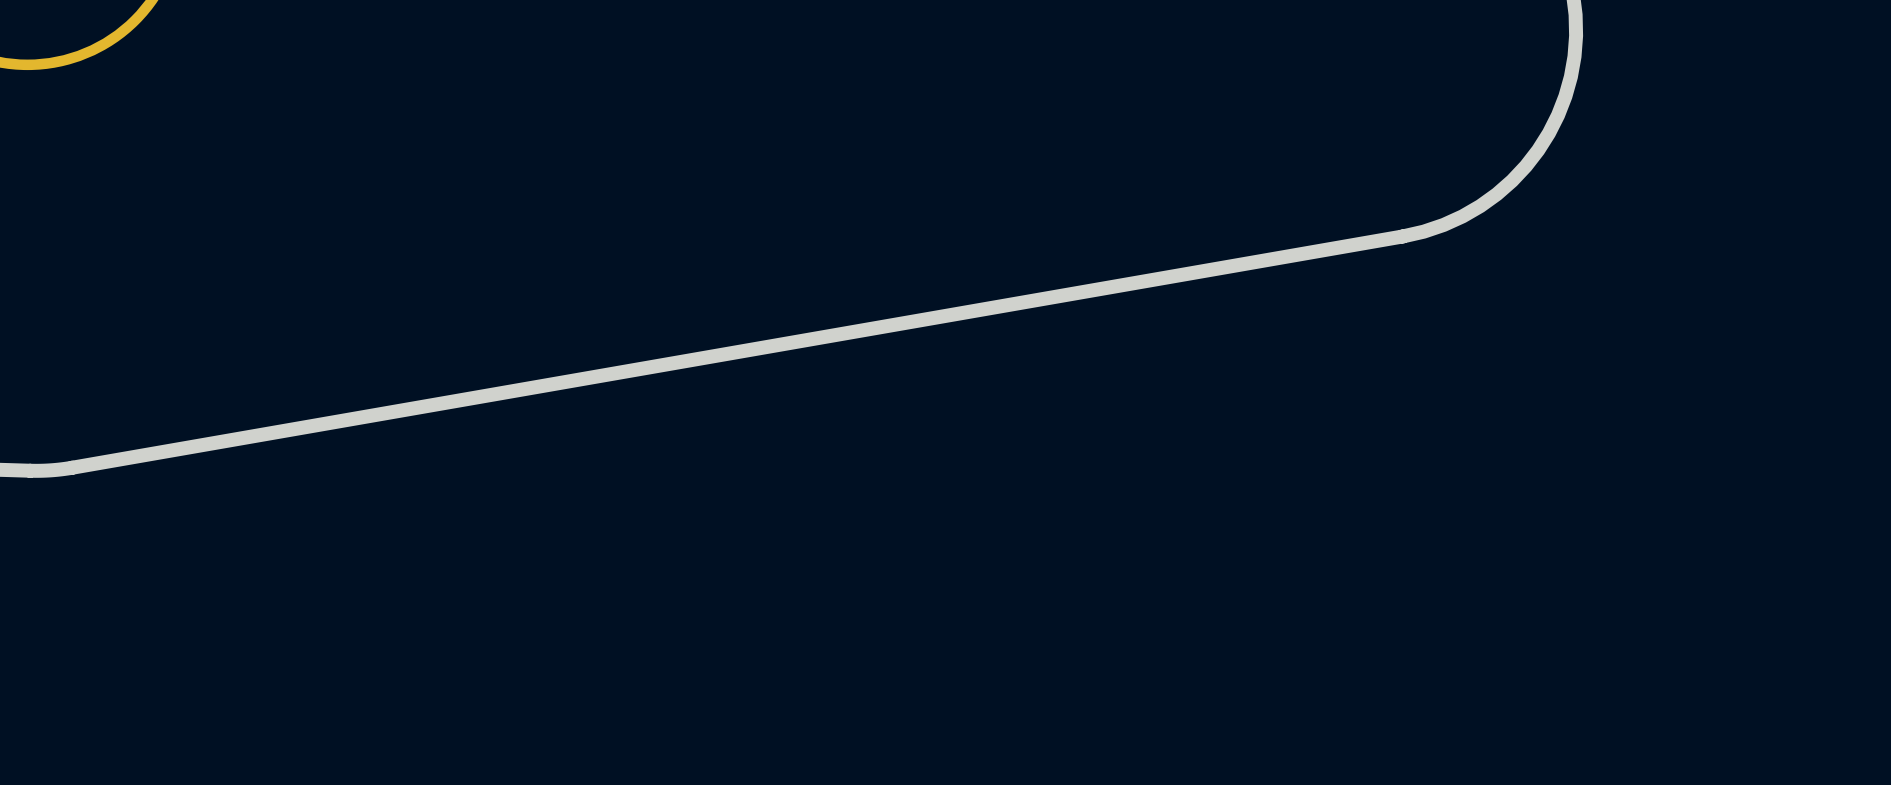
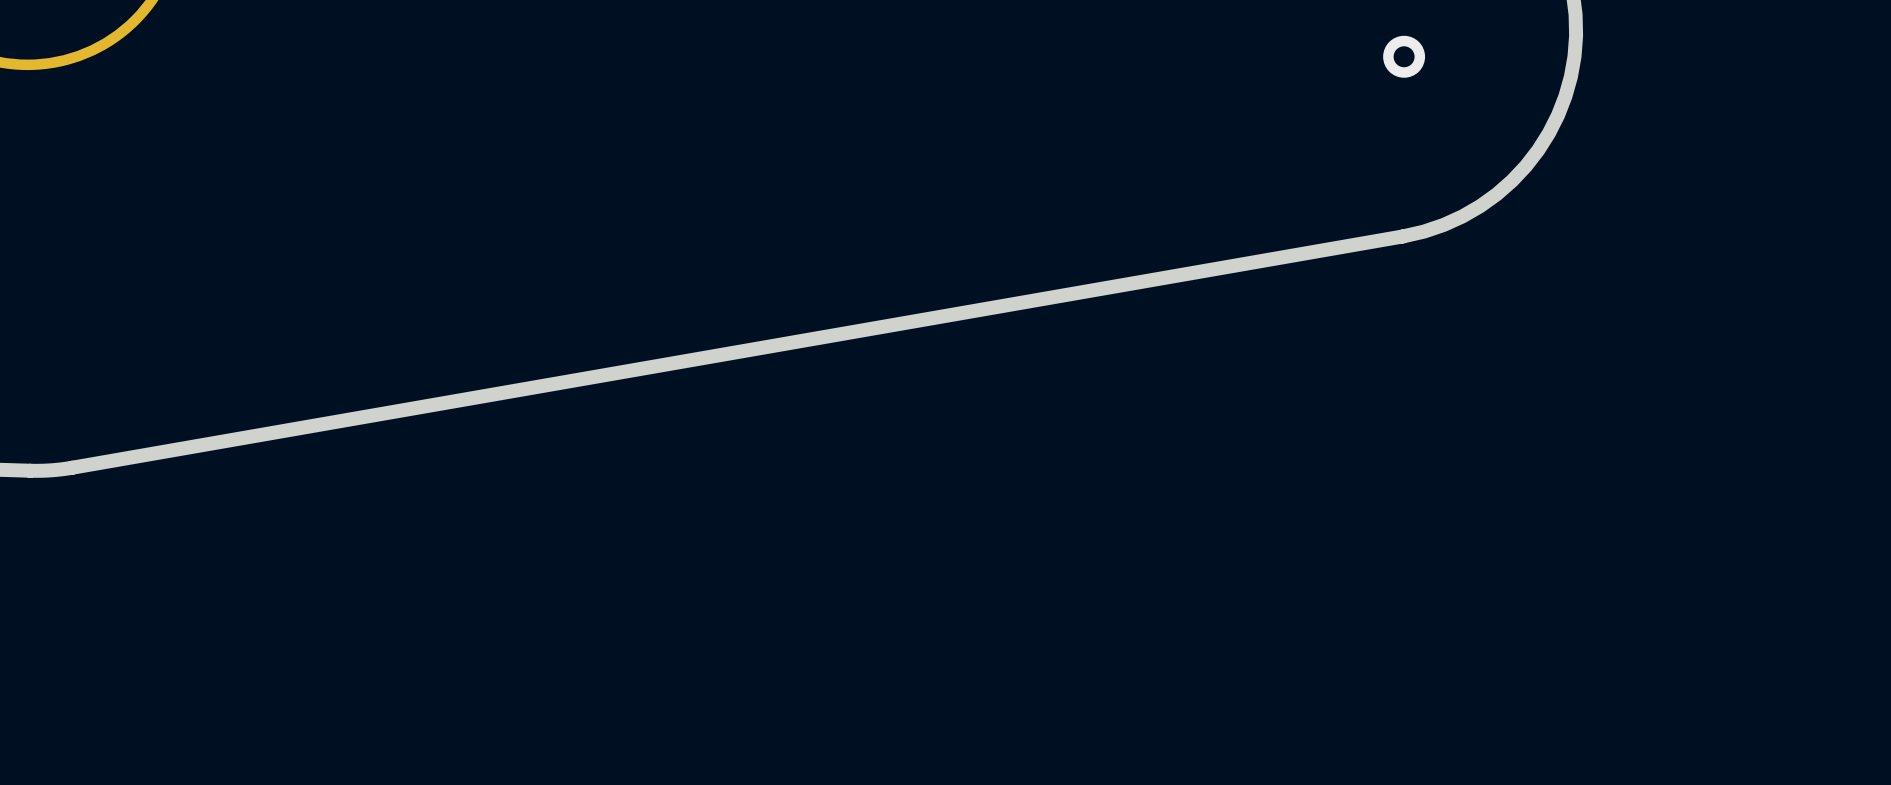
via: none -> (1404, 56)

